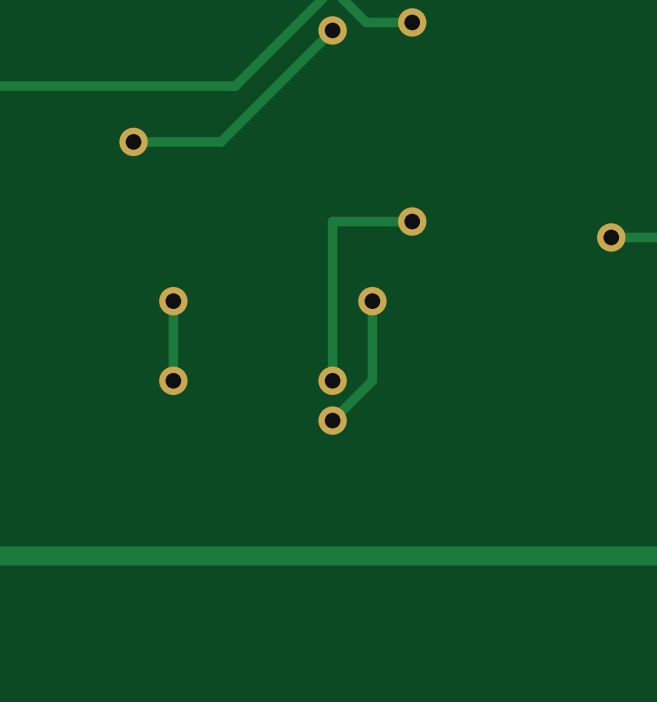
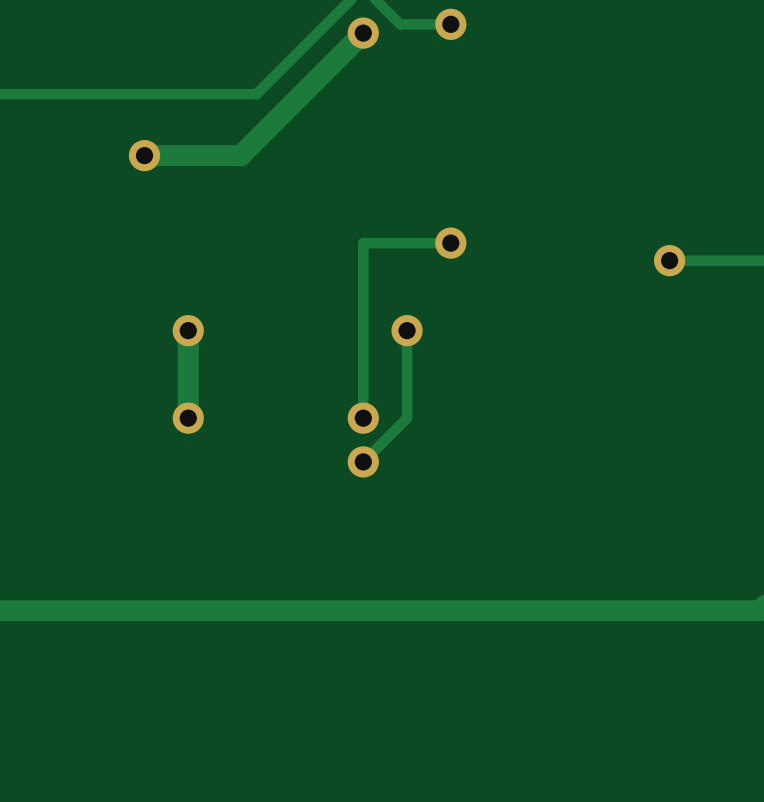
track width: thin (332, 30) (221, 141) (133, 141) -> thick (363, 33) (240, 155) (144, 155)
track width: thin (173, 301) (173, 380) -> thick (188, 330) (188, 418)

